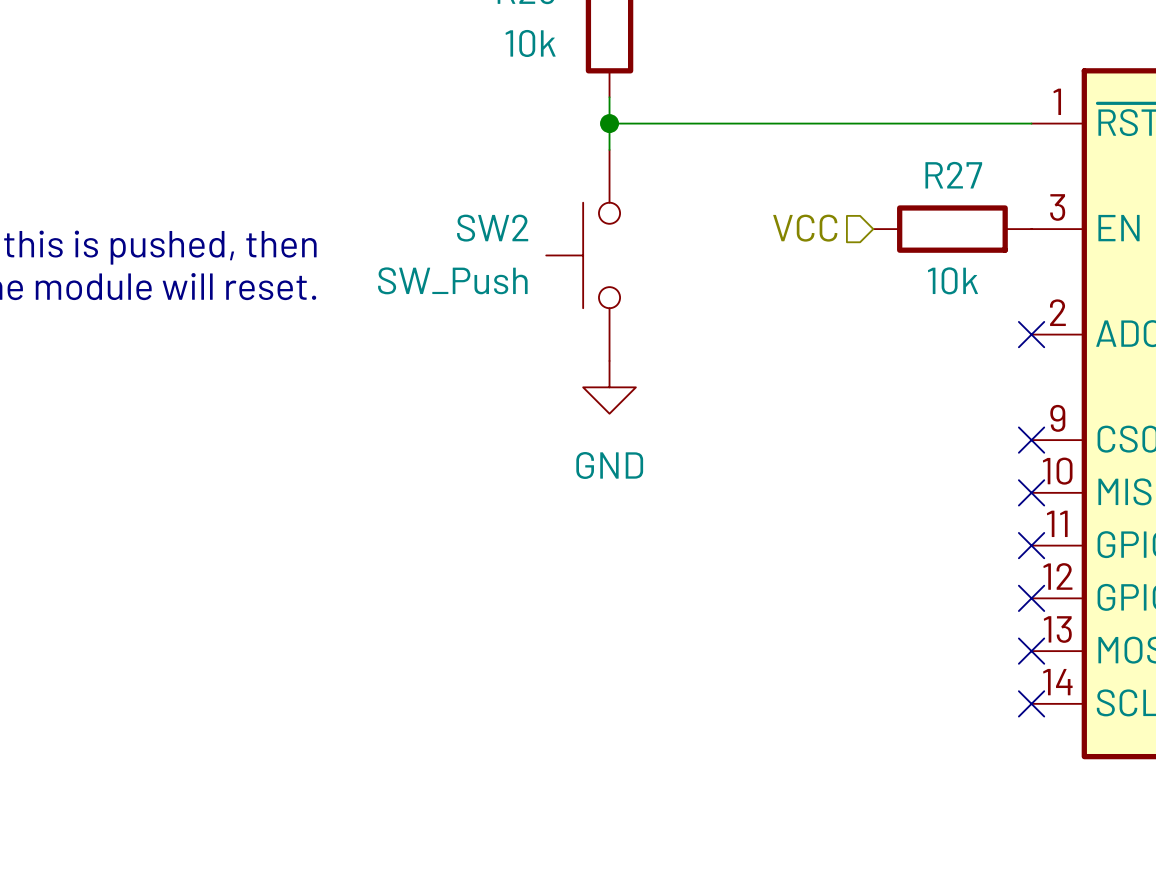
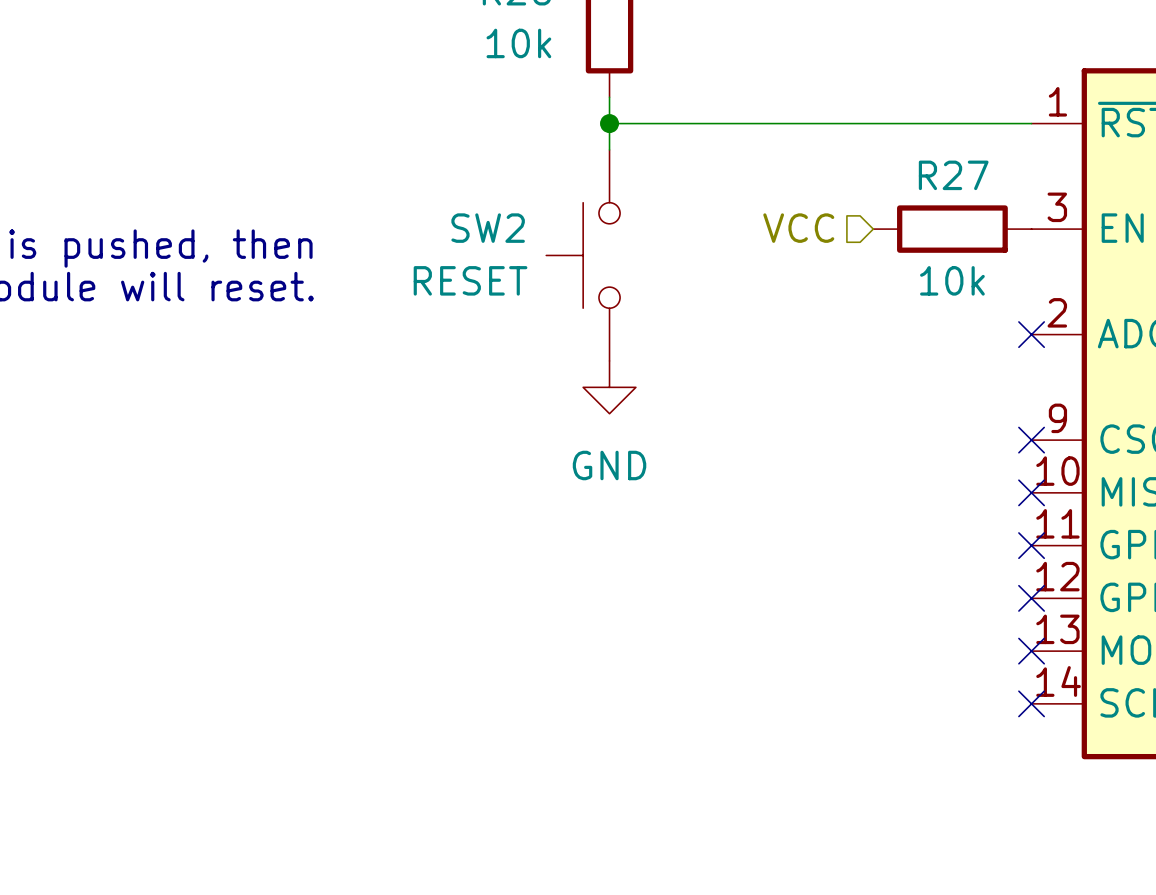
SW2 value: SW_Push (452, 280) -> RESET (470, 280)

